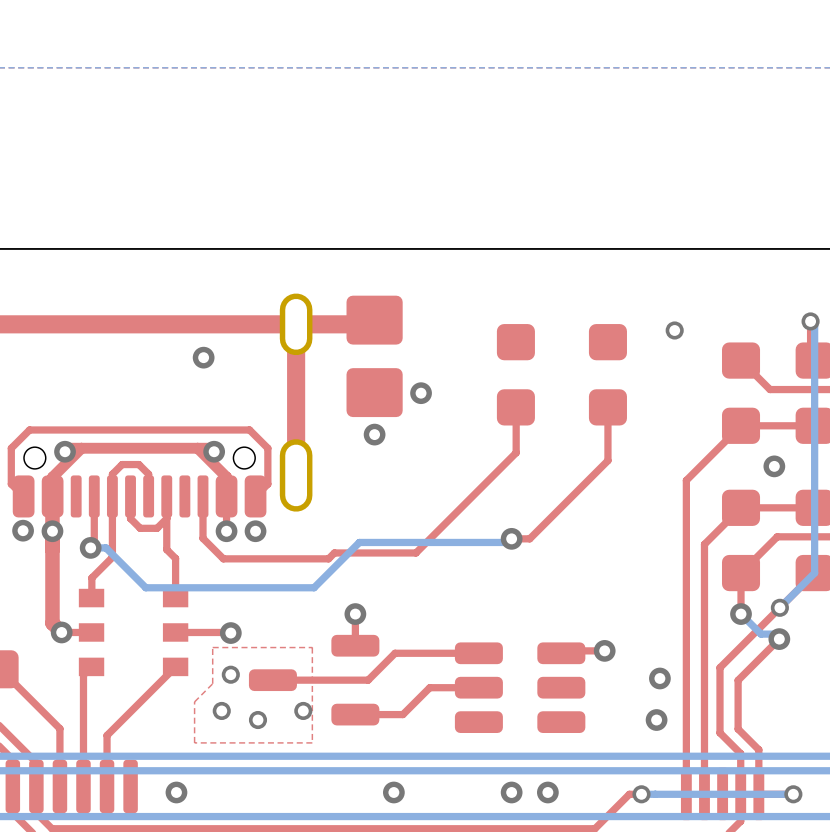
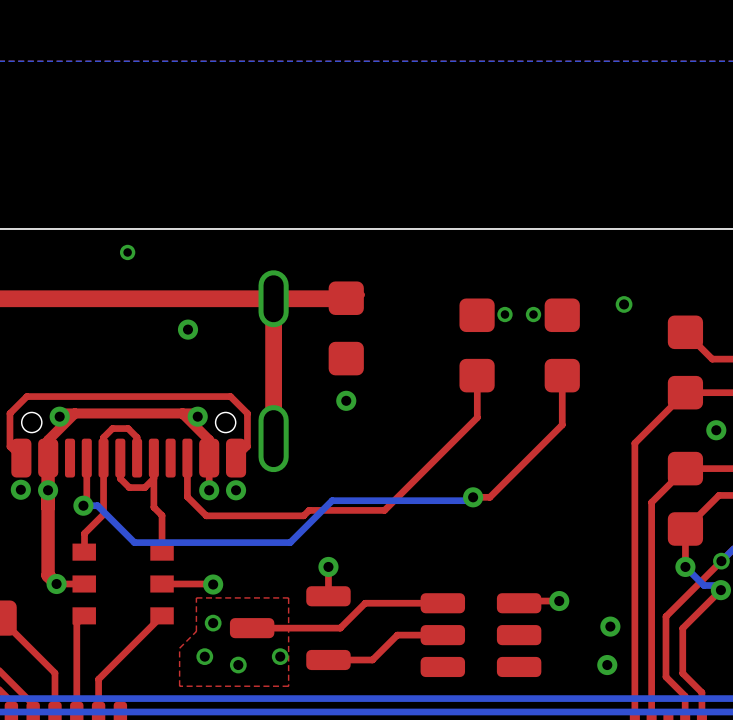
via: none -> (127, 252)
part footprint: [346, 295, 403, 418] -> [328, 281, 364, 376]
via: none -> (504, 314)
via: none -> (533, 314)
via: (421, 393) -> none

